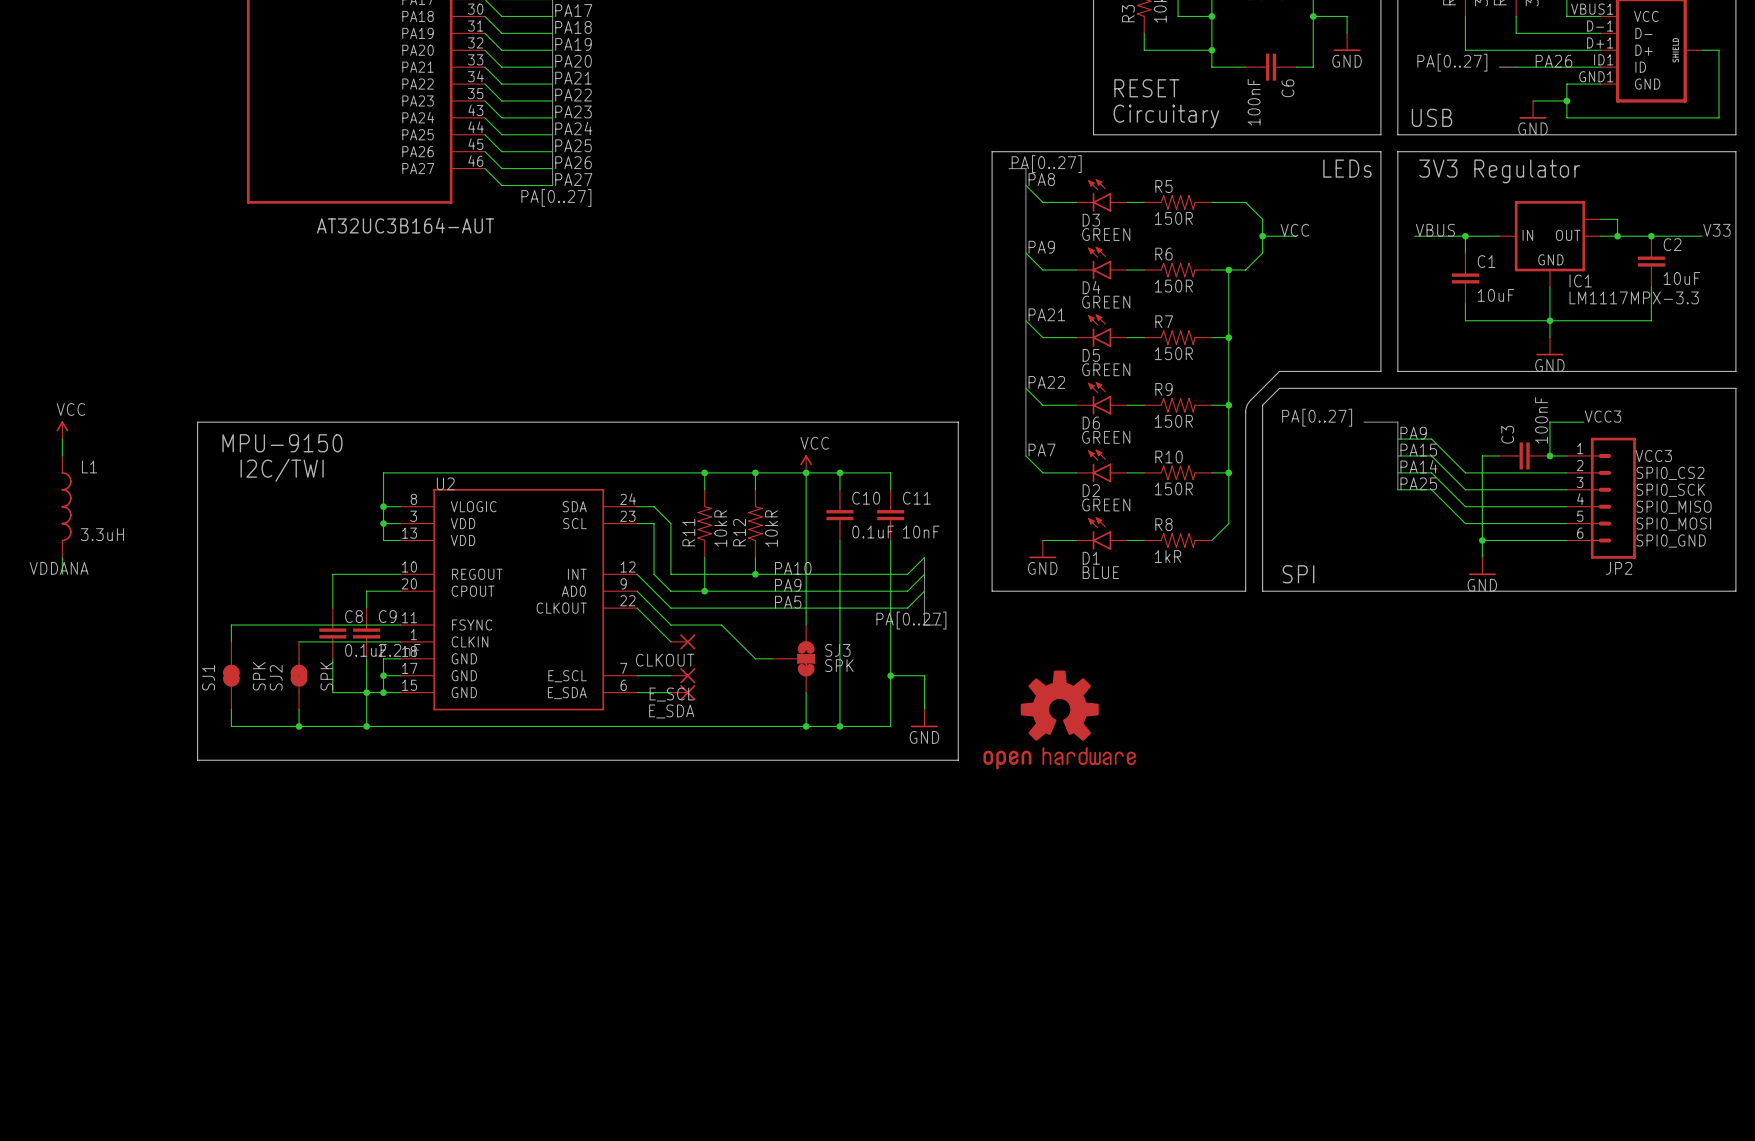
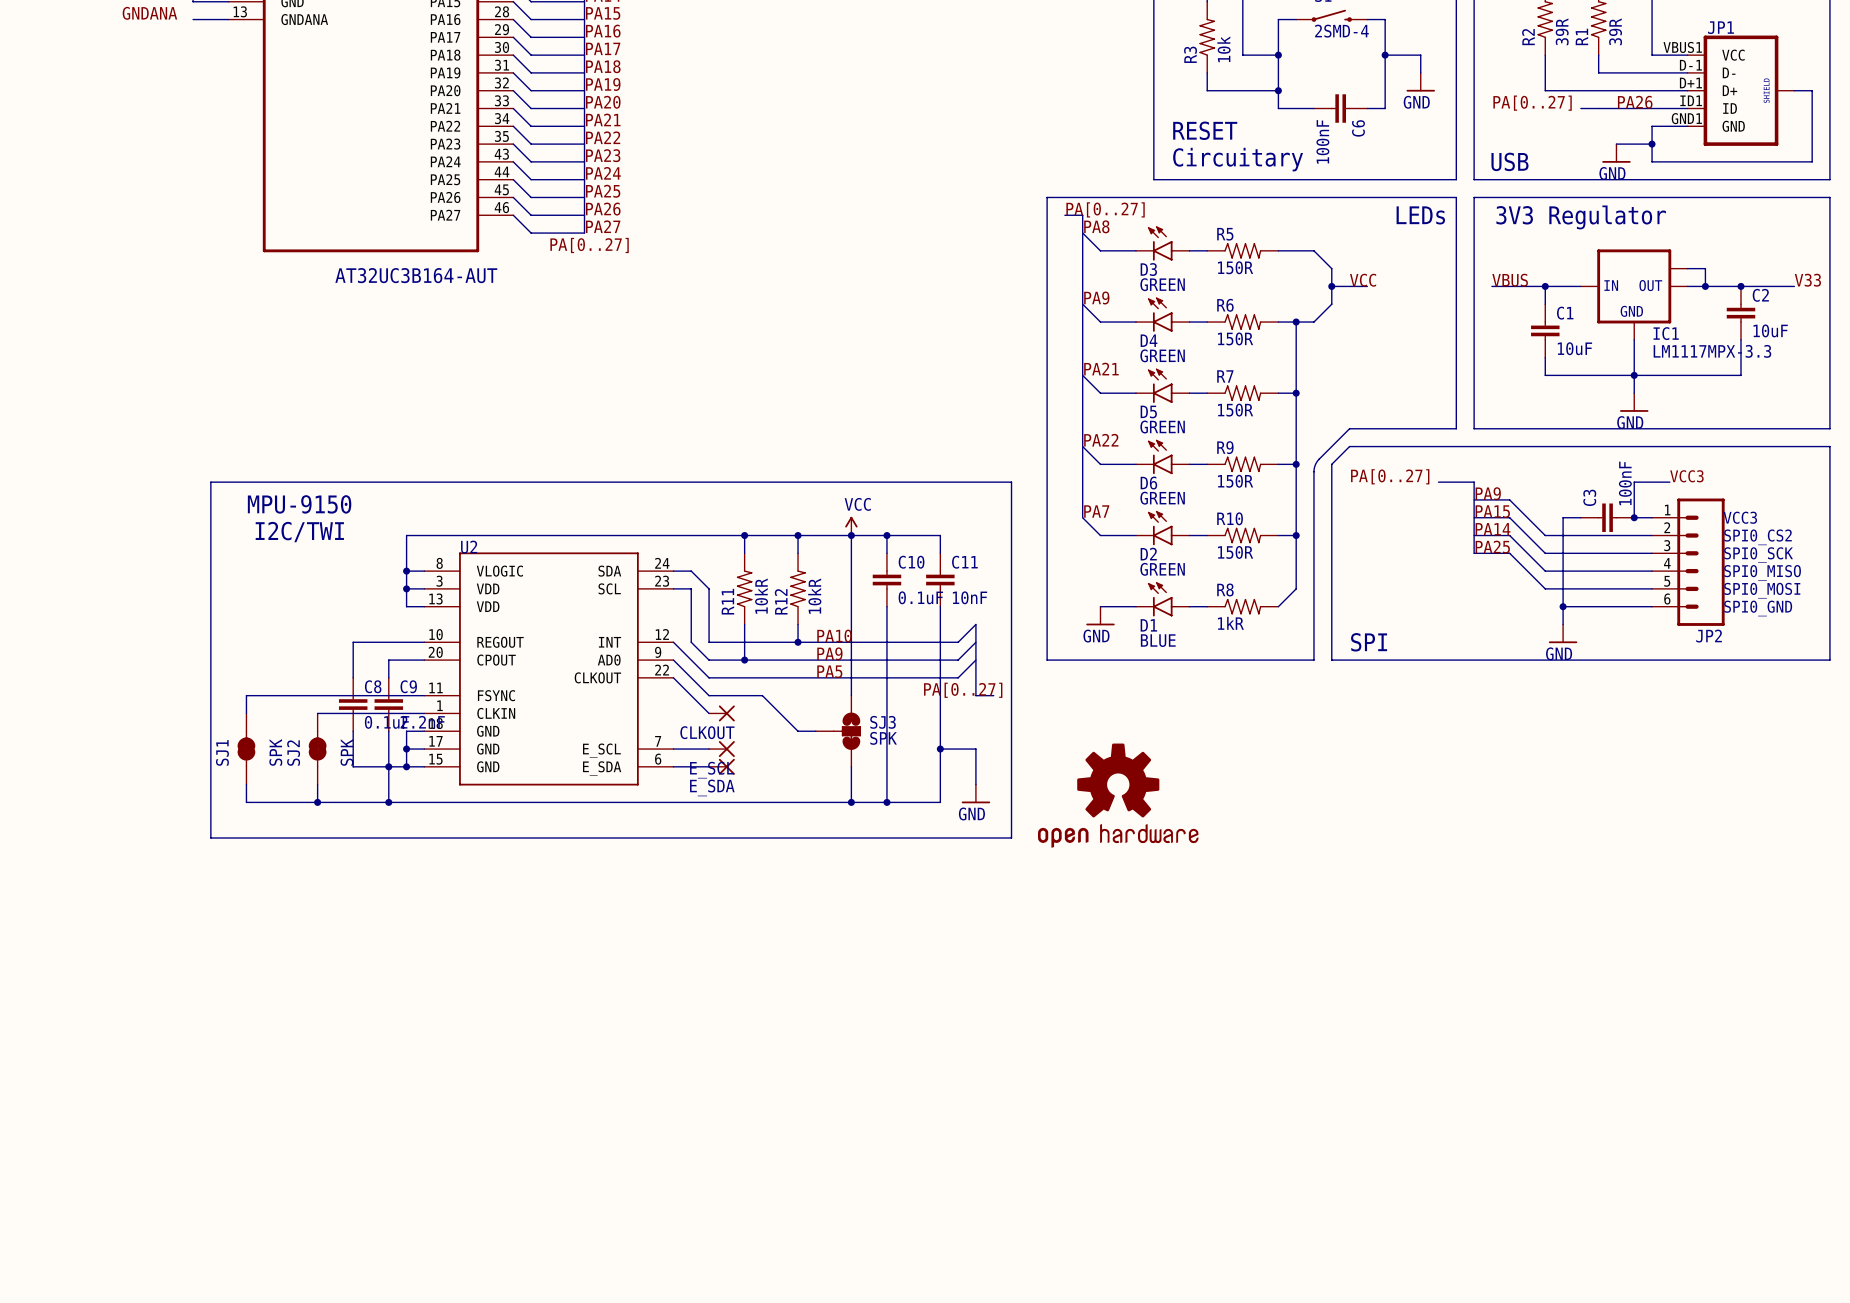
power symbol: VCC (62, 430) -> none
wire: (62, 439) (62, 455) -> none
L1: 3.3uH (66, 506) -> none
wire: (62, 557) (62, 574) -> none
label: VDDANA (59, 568) -> none

